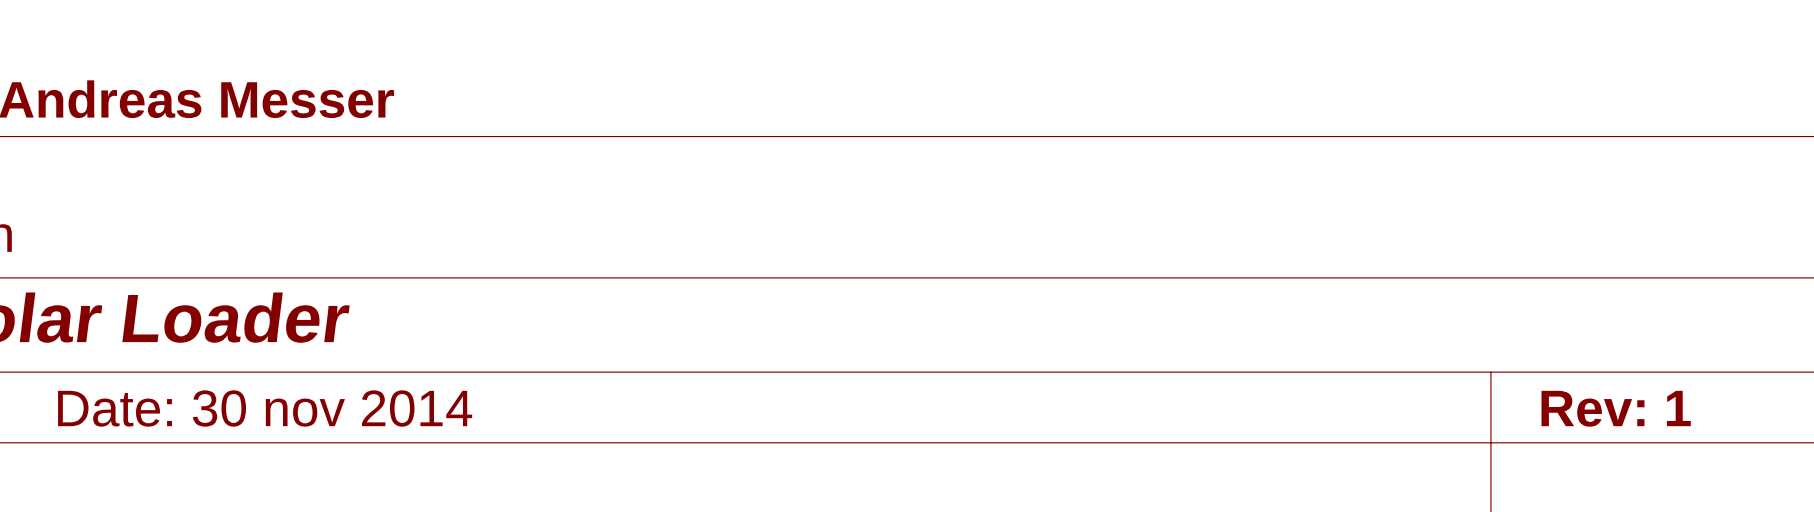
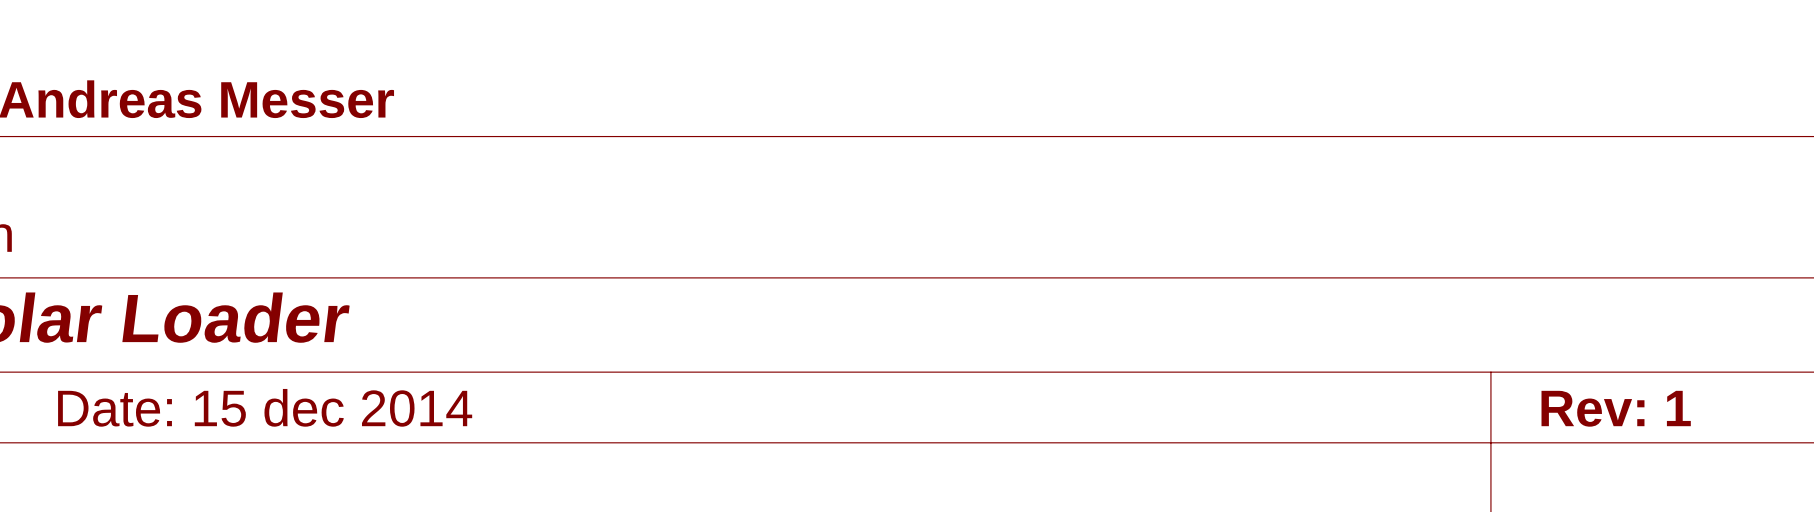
title block: Date: 30 nov 2014 (265, 408) -> Date: 15 dec 2014 (265, 407)

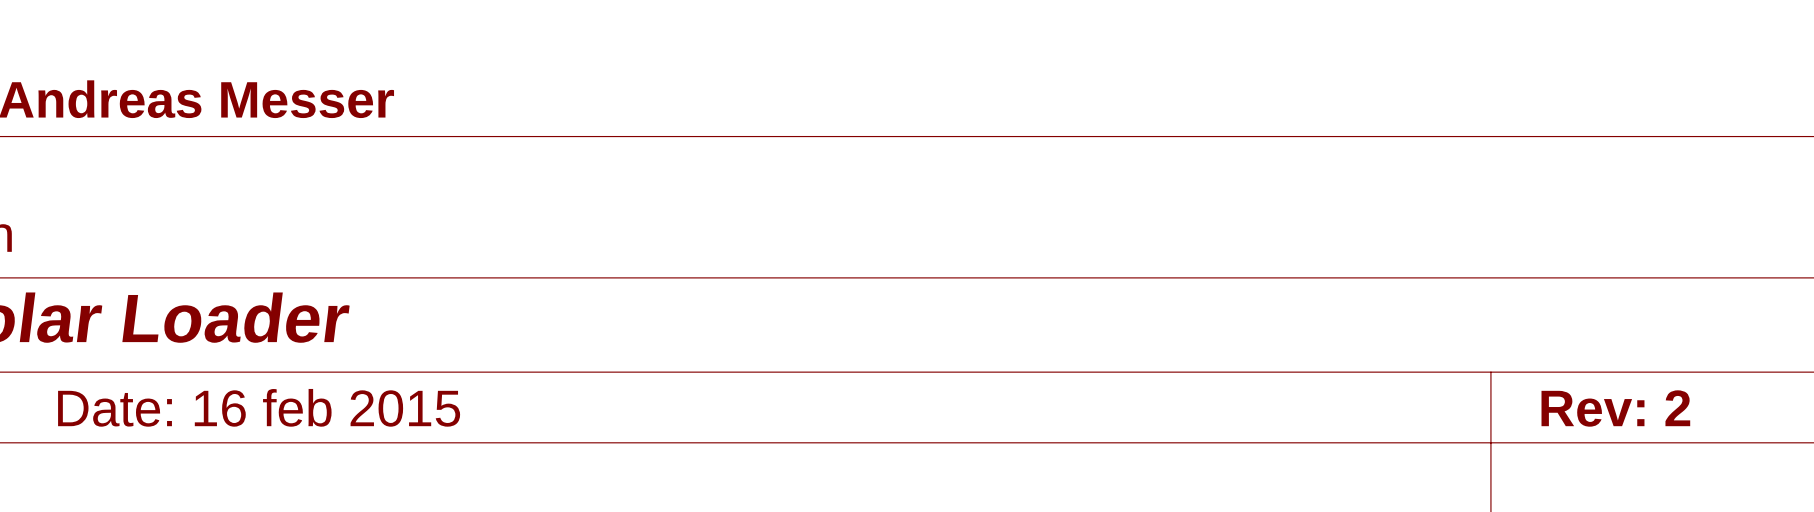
title block: Date: 15 dec 2014 (265, 407) -> Date: 16 feb 2015 (259, 407)
title block: Rev: 1 (1616, 408) -> Rev: 2 (1615, 408)

